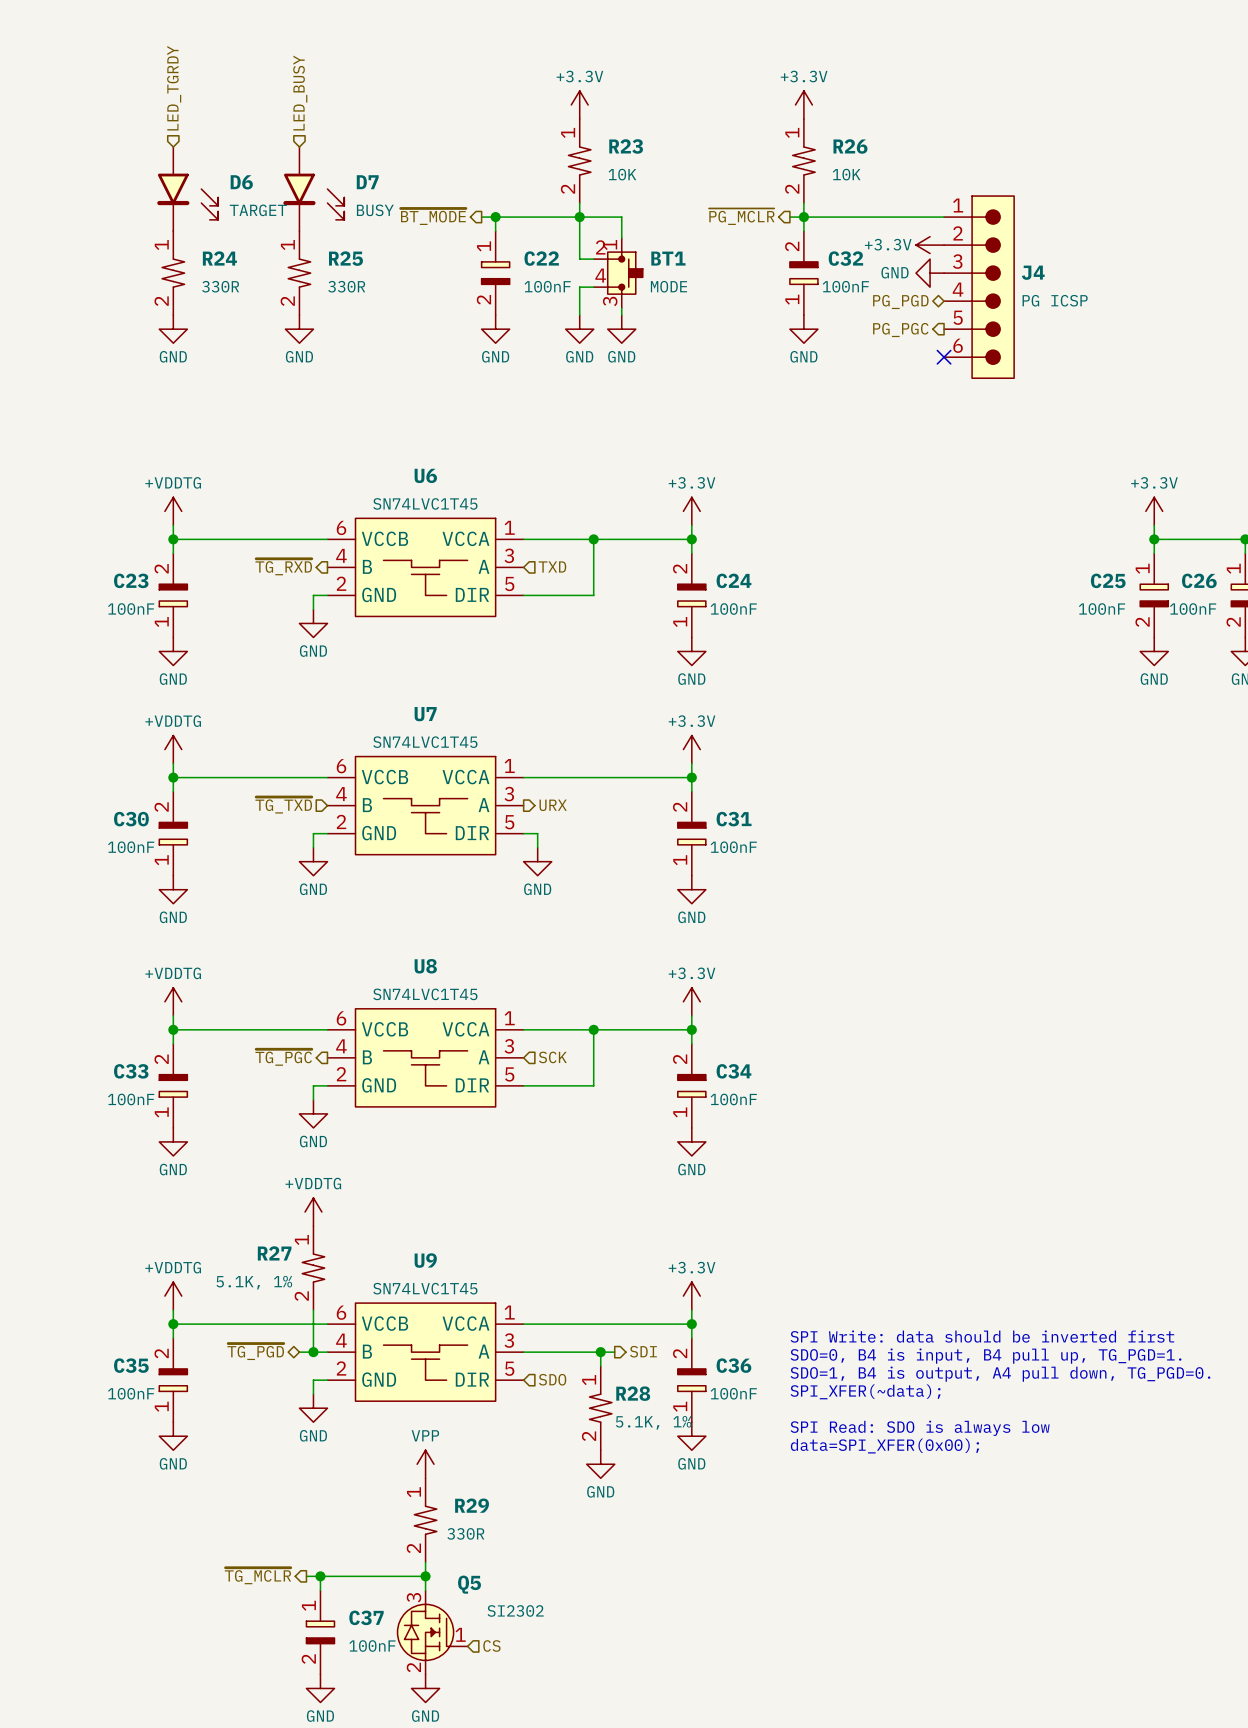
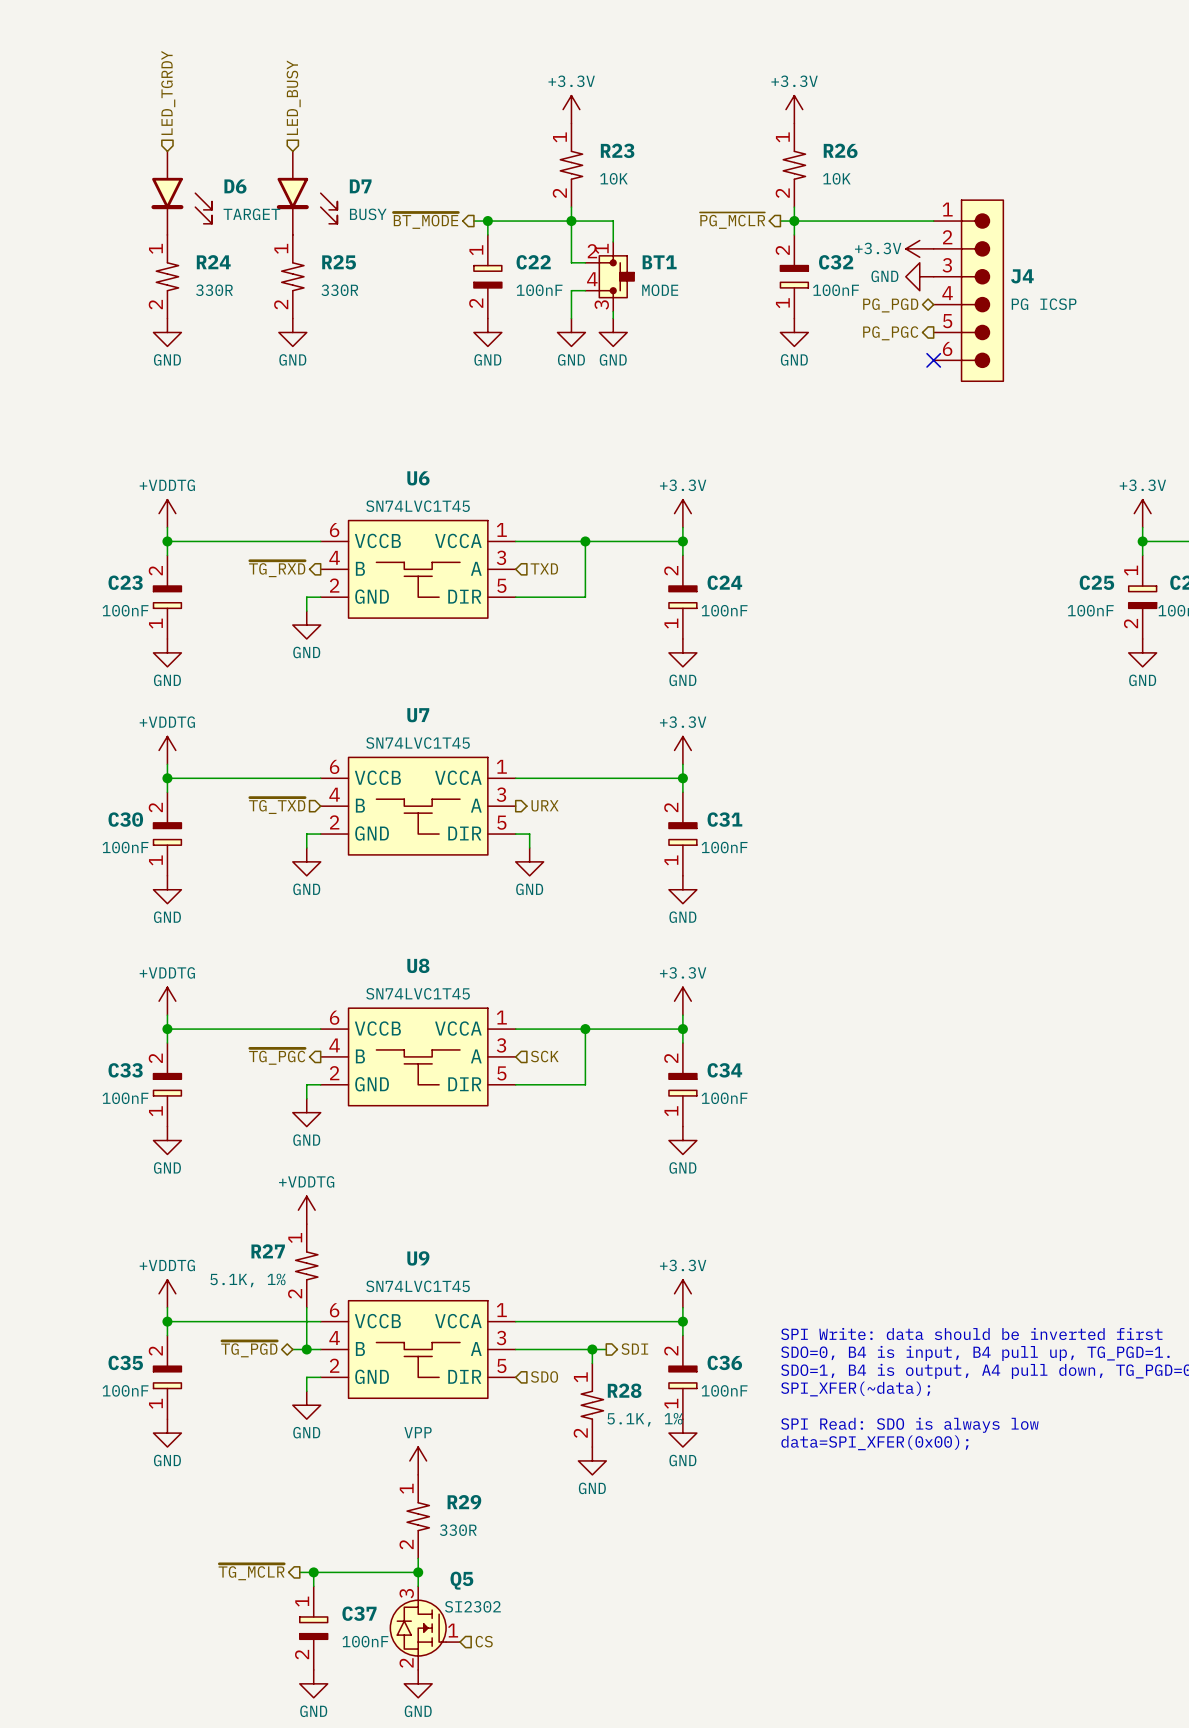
Q5 value position: SI2302 (515, 1610) -> SI2302 (472, 1606)

